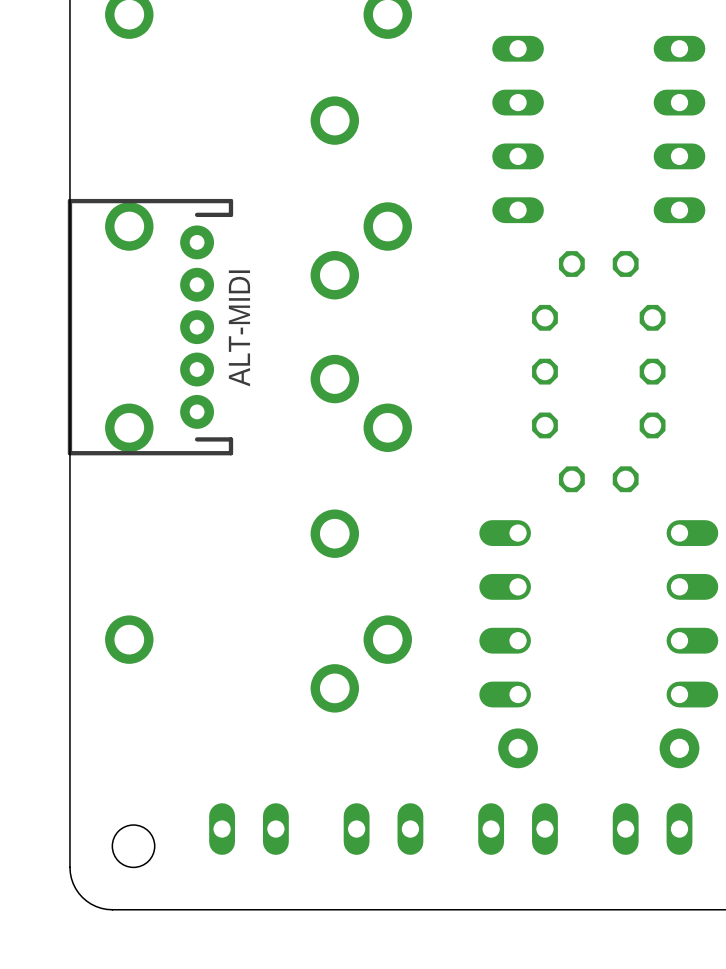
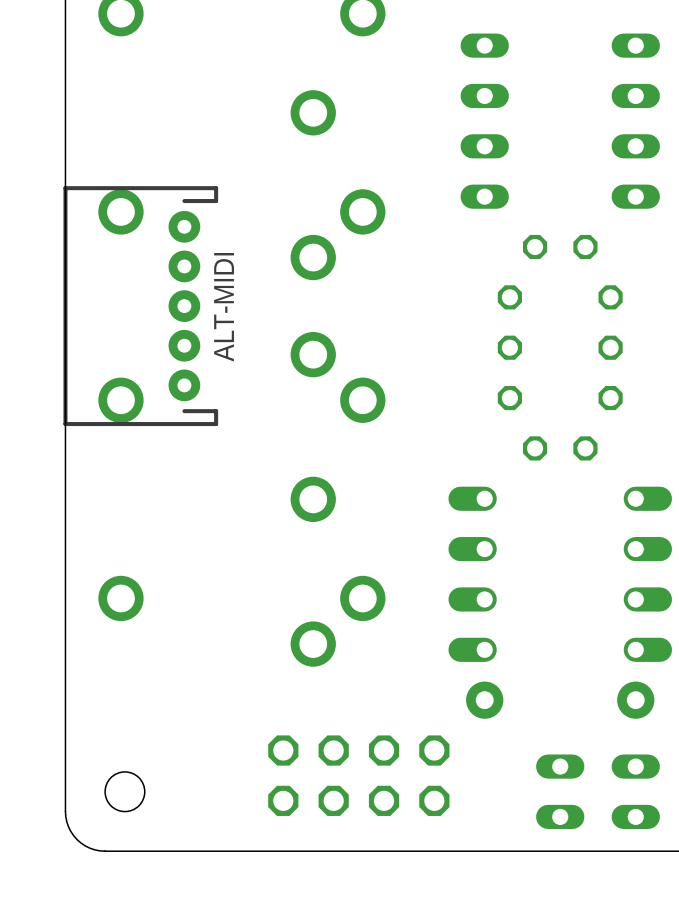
part footprint: [343, 803, 424, 855] -> [268, 735, 450, 816]
part: (248, 829) -> none
part: (518, 829) -> none
part: (652, 829) -> none
part: none -> (560, 791)
part: none -> (635, 791)

